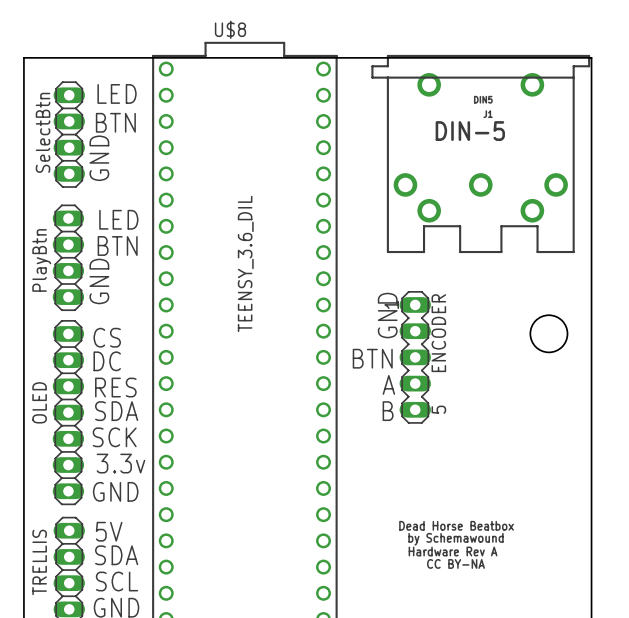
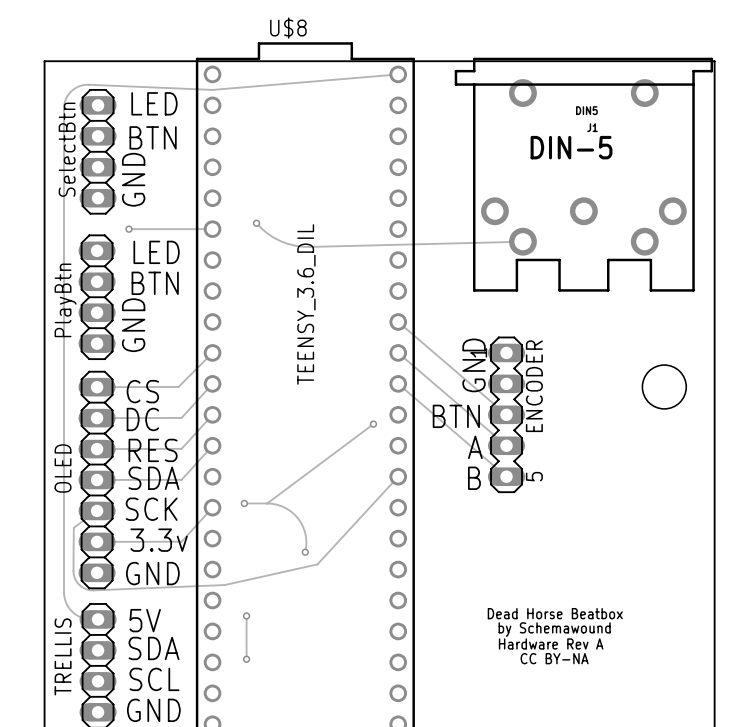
track: none -> (398, 74) (212, 89) (85, 84) (73, 89) (66, 97) (64, 108) (64, 592) (66, 602) (74, 613) (83, 618) (98, 619)
track: none -> (256, 223) (273, 237) (287, 243) (302, 246) (522, 241)
via: none -> (256, 223)
track: none -> (128, 229) (212, 229)
via: none -> (128, 229)
track: none -> (398, 321) (506, 414)
track: none -> (212, 352) (178, 386) (97, 387)
track: none -> (398, 352) (506, 445)
track: none -> (212, 383) (181, 417) (97, 418)
track: none -> (398, 383) (506, 476)
track: none -> (212, 414) (181, 448) (97, 449)
track: none -> (373, 424) (267, 503)
via: none -> (373, 424)
track: none -> (212, 445) (181, 479) (97, 480)
track: none -> (398, 476) (317, 564) (224, 585) (93, 590) (82, 587) (76, 581) (73, 573) (73, 527) (97, 510)
track: none -> (244, 503) (267, 503)
via: none -> (244, 503)
track: none -> (267, 503) (286, 508) (298, 518) (306, 537) (305, 552)
track: none -> (212, 507) (181, 541) (97, 541)
via: none -> (305, 552)
track: none -> (246, 615) (246, 659)
via: none -> (246, 615)
via: none -> (246, 659)

